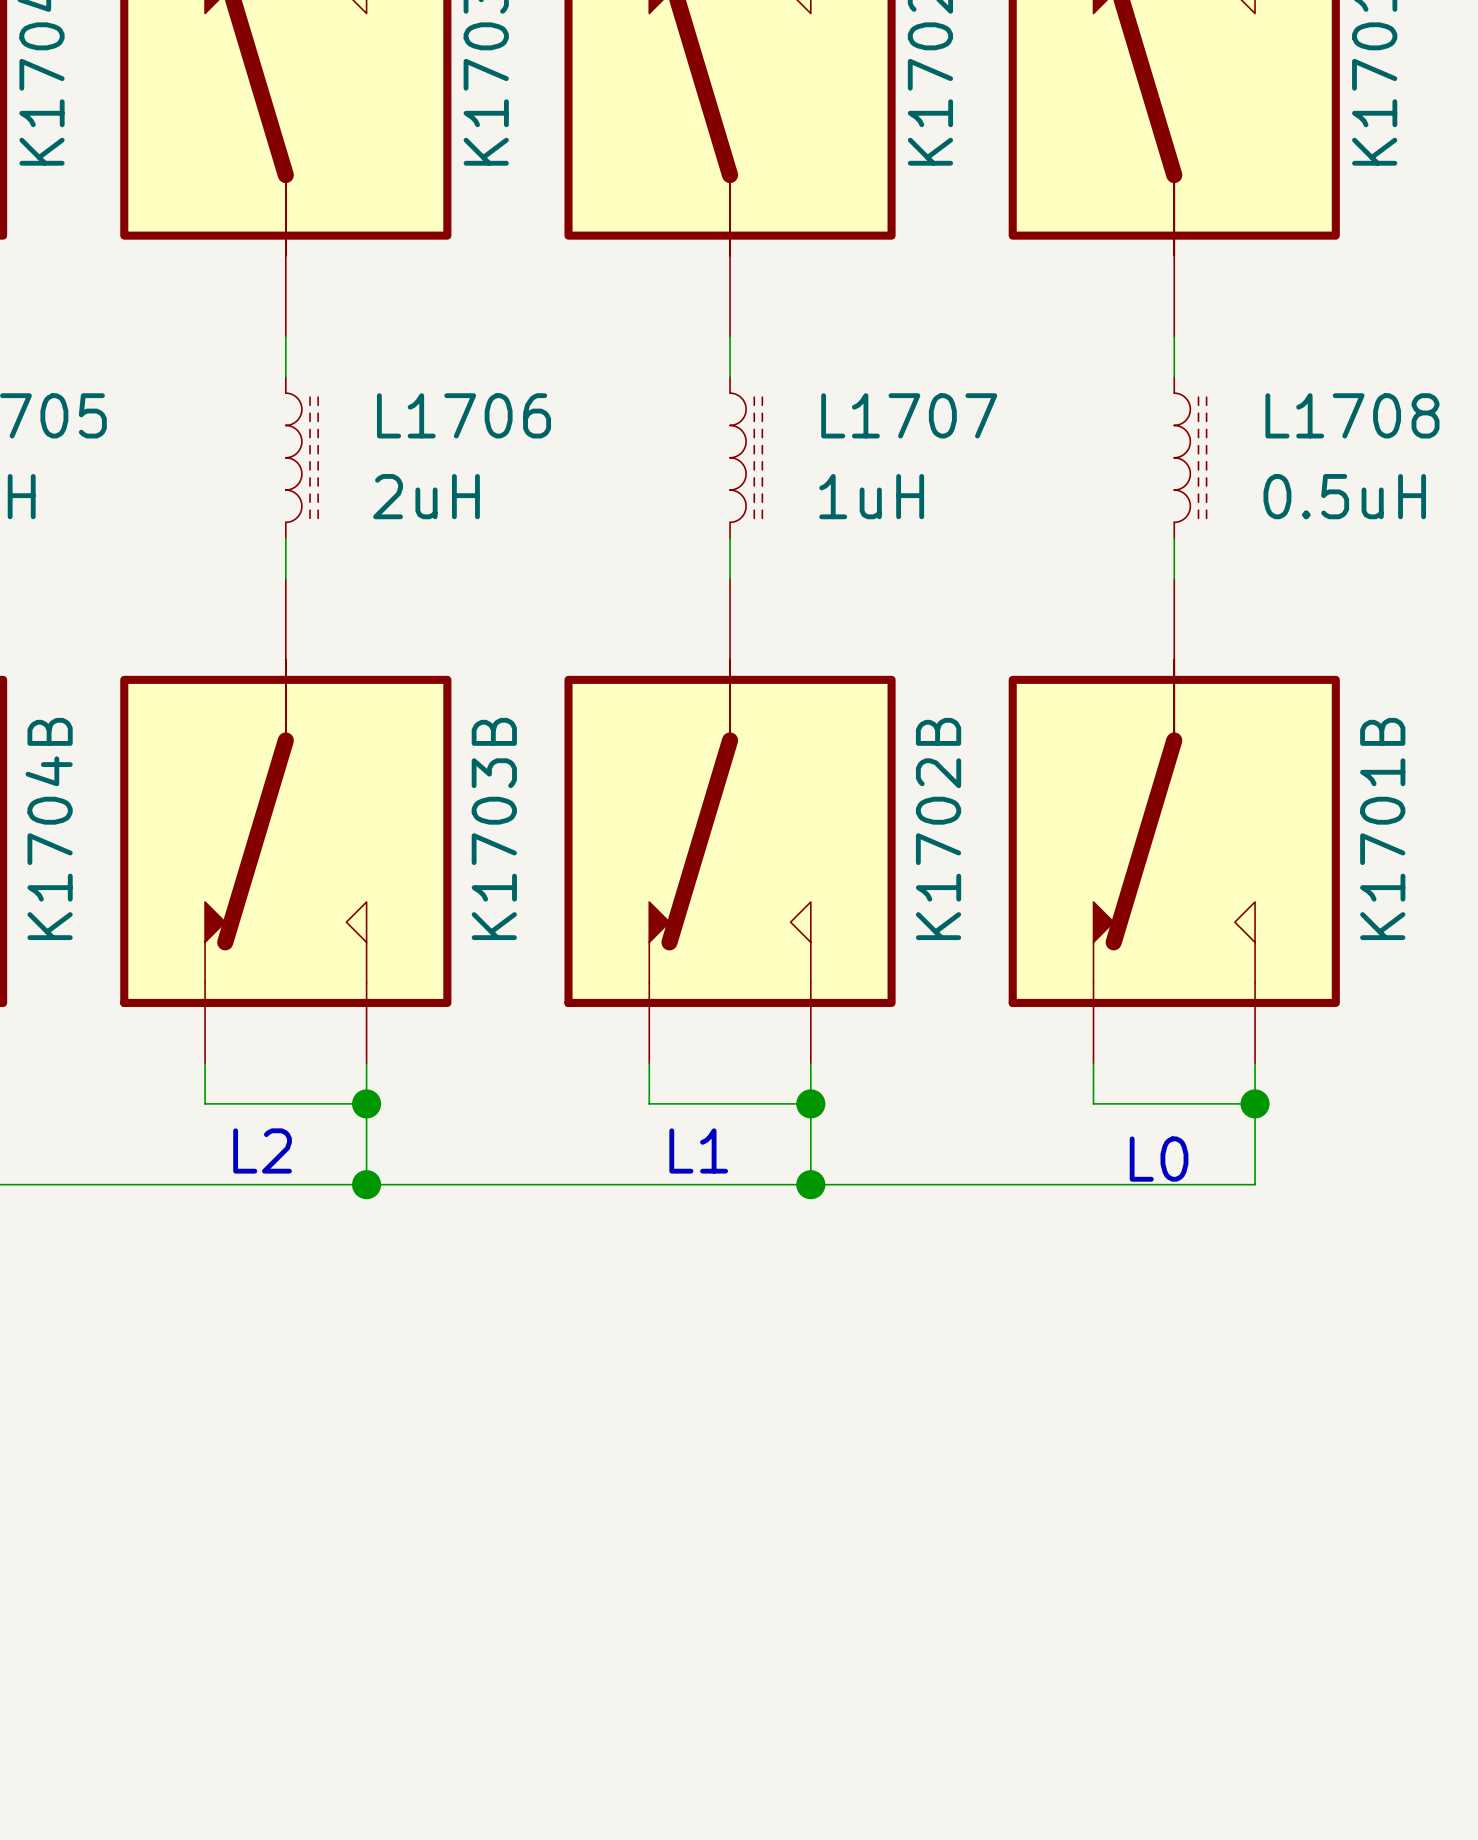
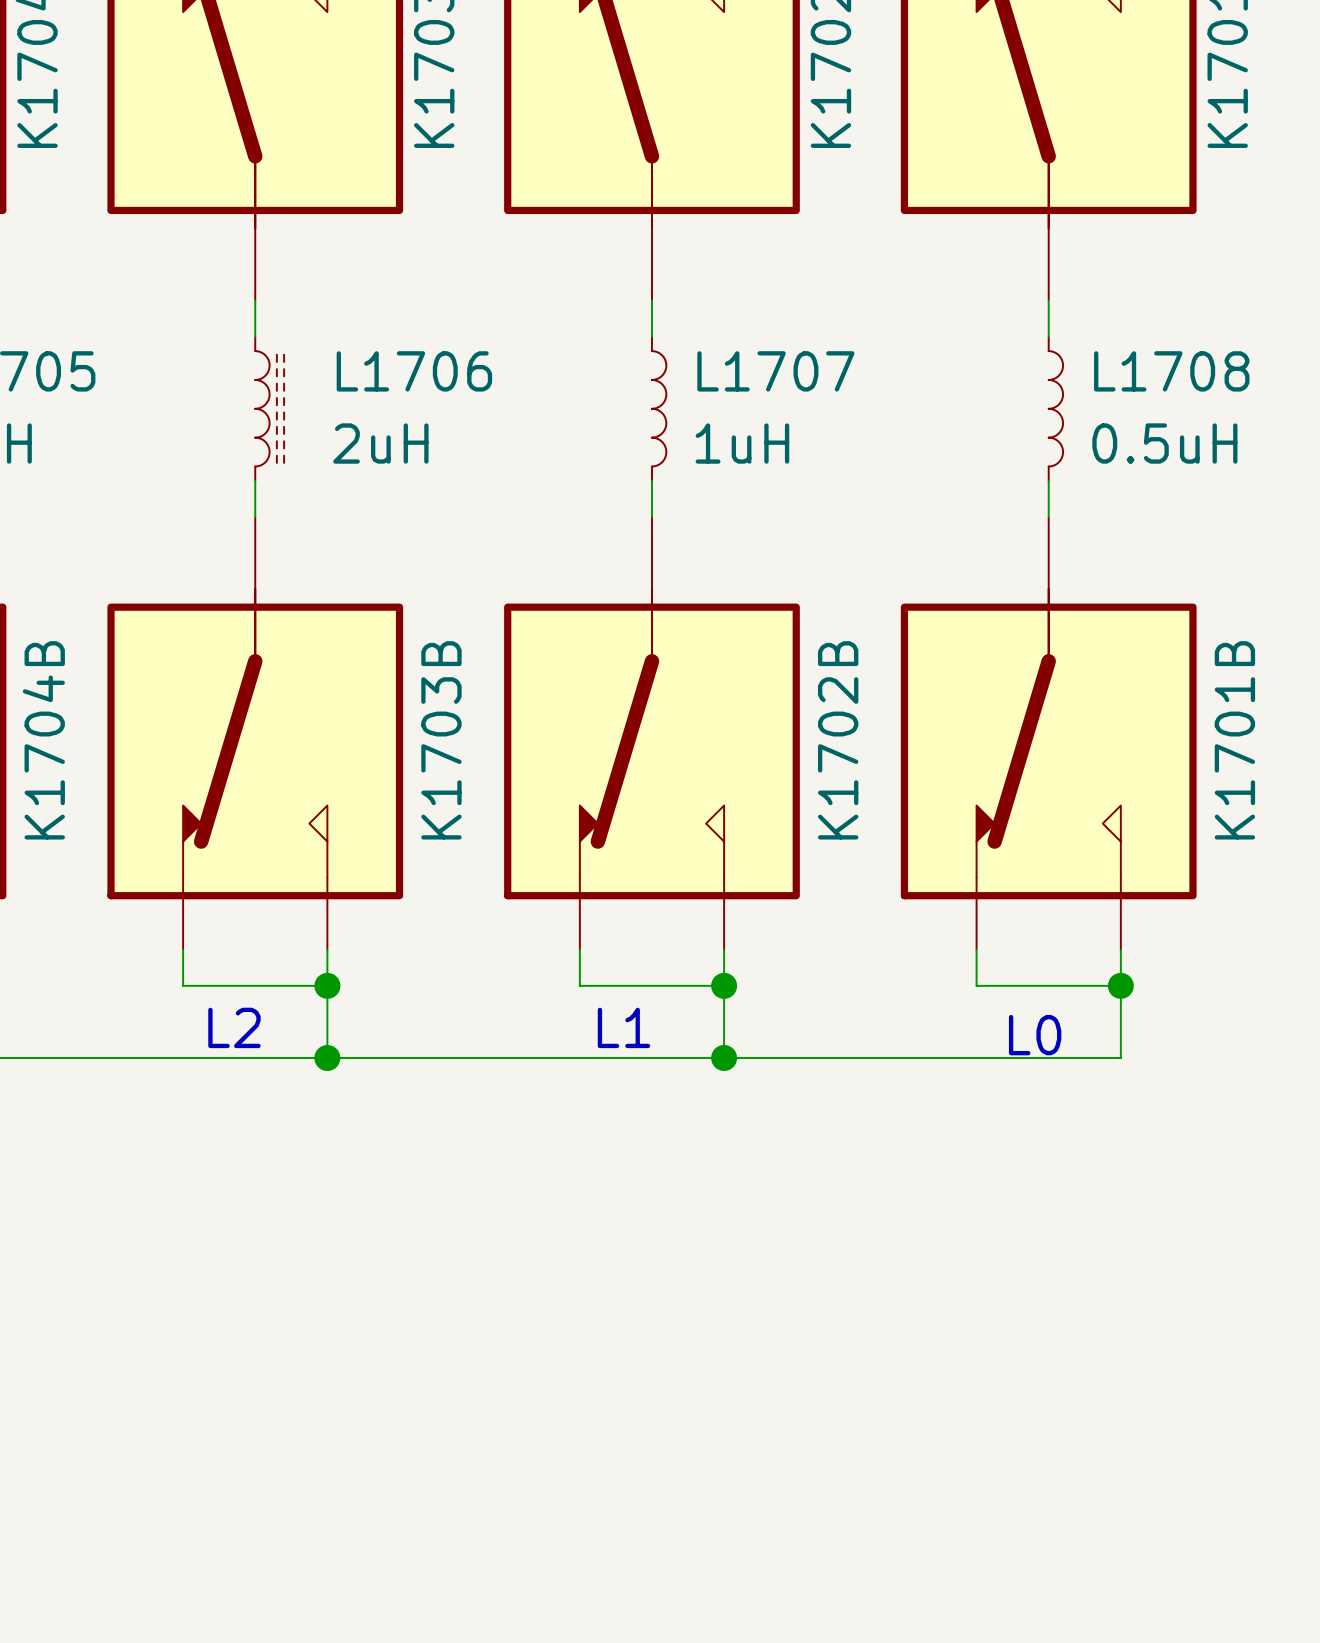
L1707 symbol: [730, 376, 763, 539] -> [651, 336, 667, 481]
L1708 symbol: [1174, 376, 1207, 539] -> [1048, 336, 1064, 481]
L1707 name position: L1707 (909, 415) -> L1707 (775, 371)
L1708 name position: L1708 (1352, 415) -> L1708 (1171, 371)
L1707 value position: 1uH (871, 496) -> 1uH (742, 443)
L1708 value position: 0.5uH (1344, 496) -> 0.5uH (1164, 443)

